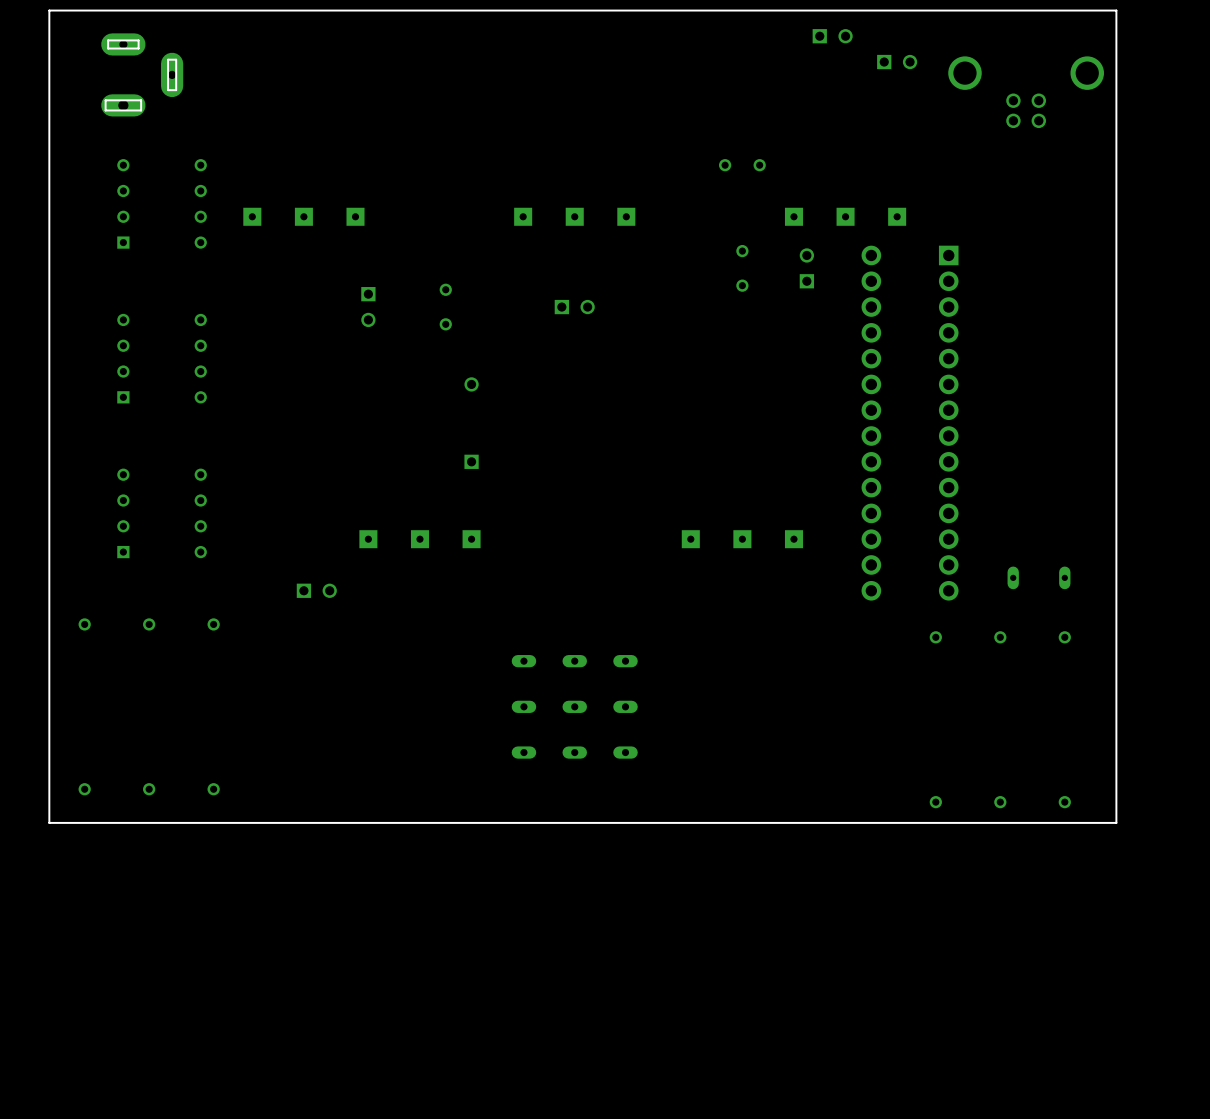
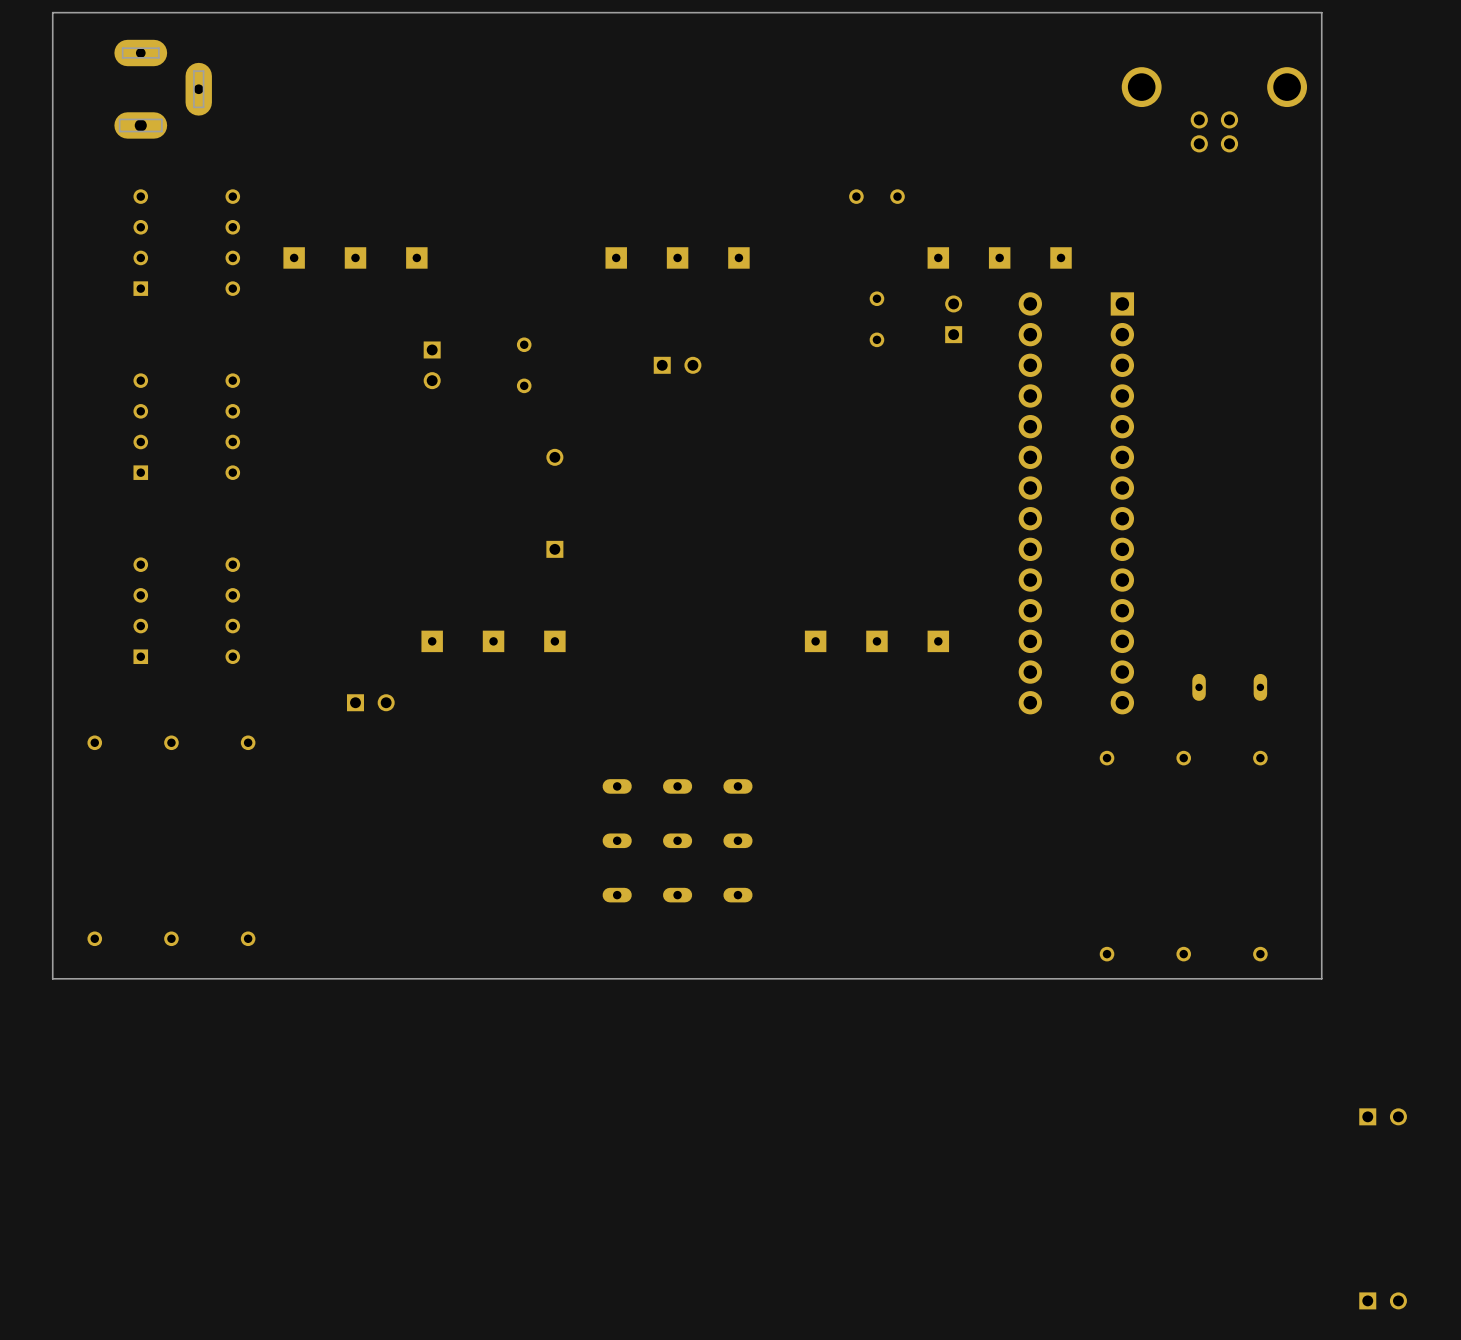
part: (832, 36) -> none
part: (897, 62) -> none
part: none -> (1383, 1116)
part: none -> (1383, 1300)

